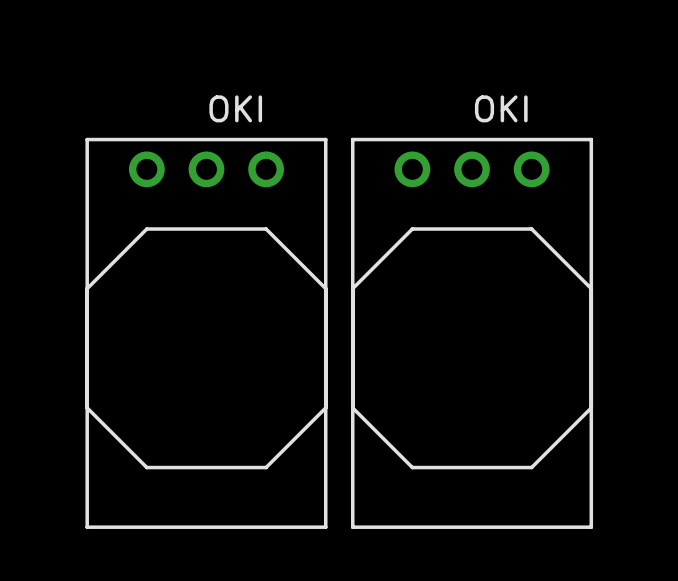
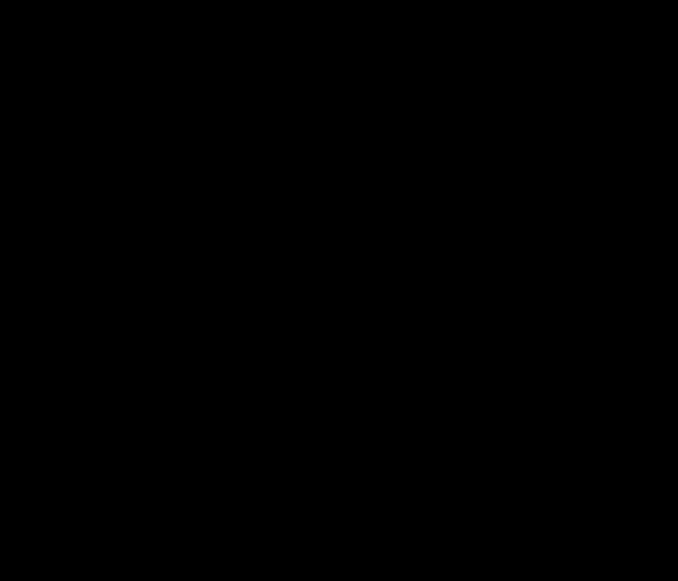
part: OKI (206, 333) -> none
part: OKI (472, 333) -> none

